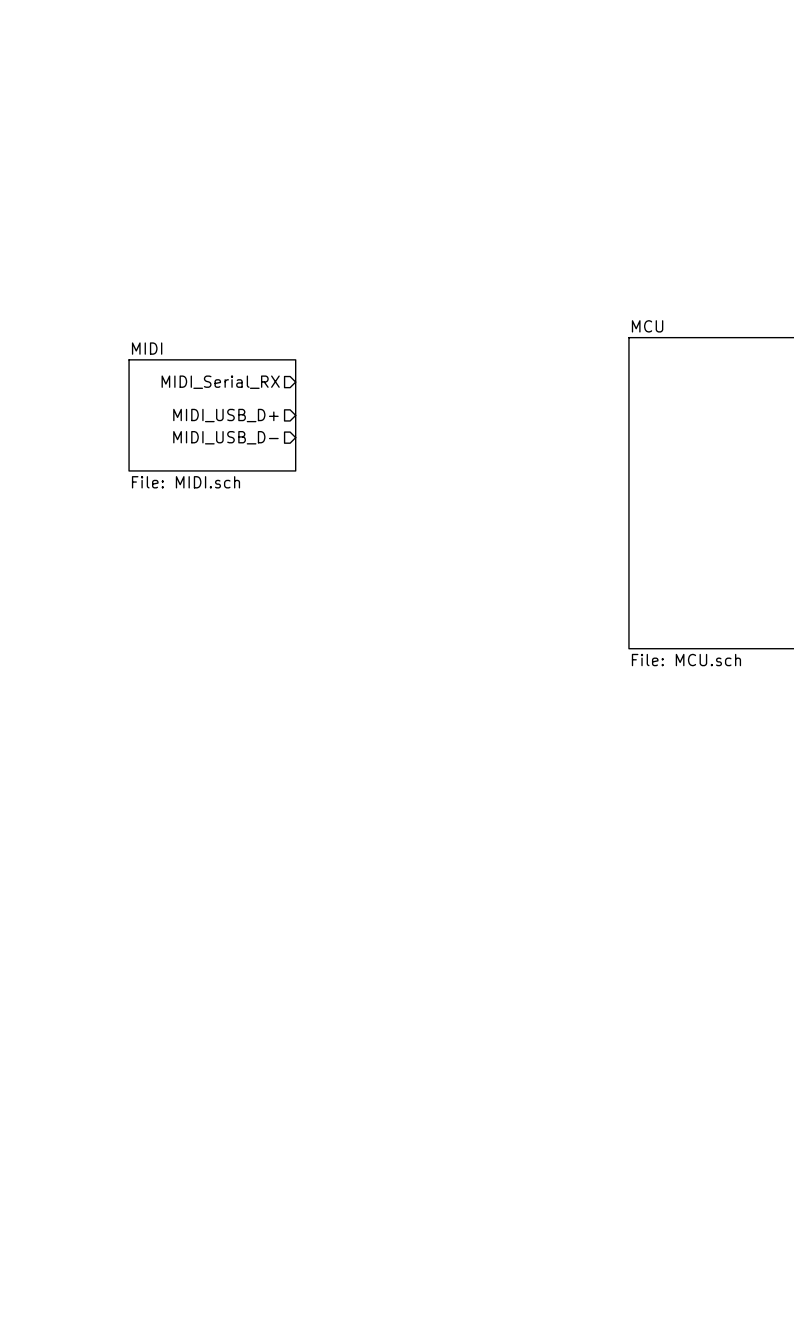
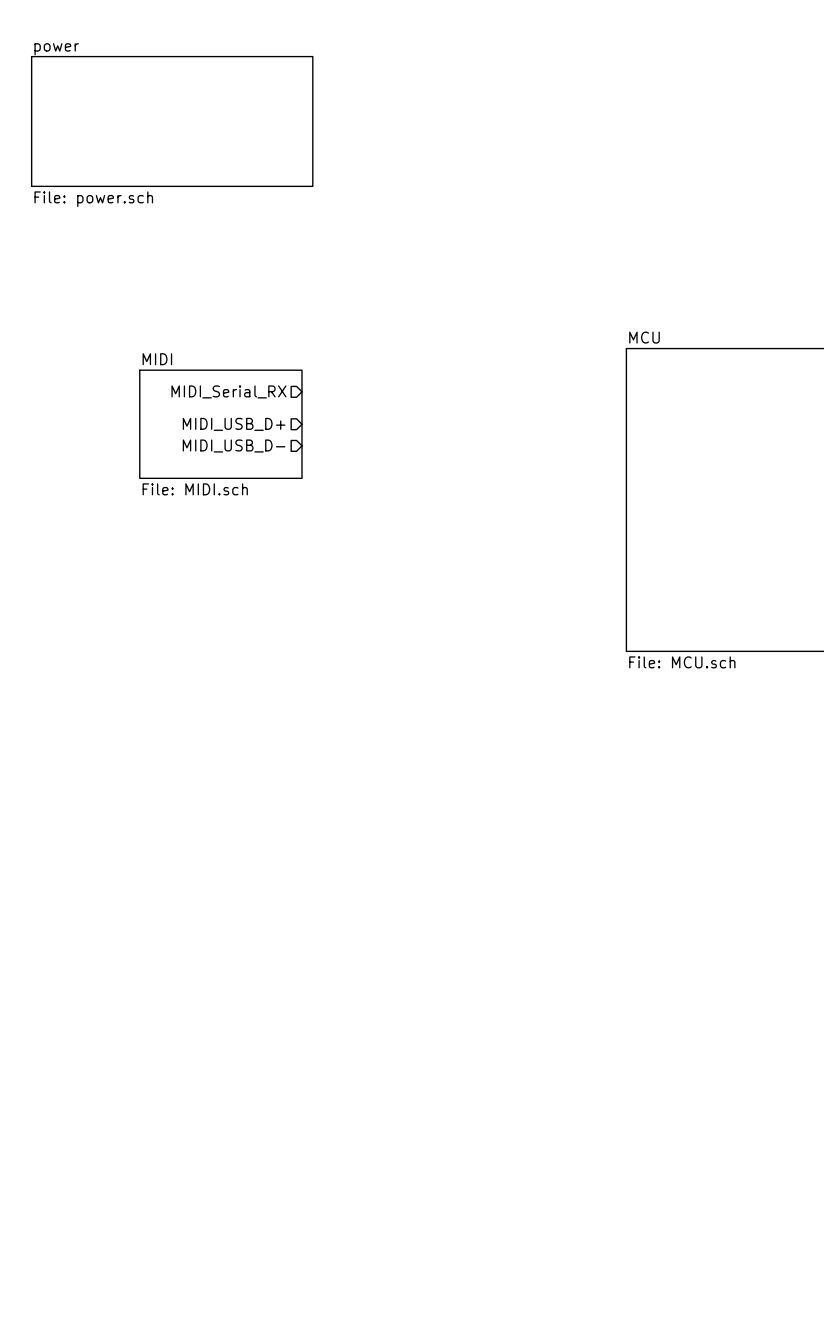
sheet power: none -> File: power.sch (172, 121)

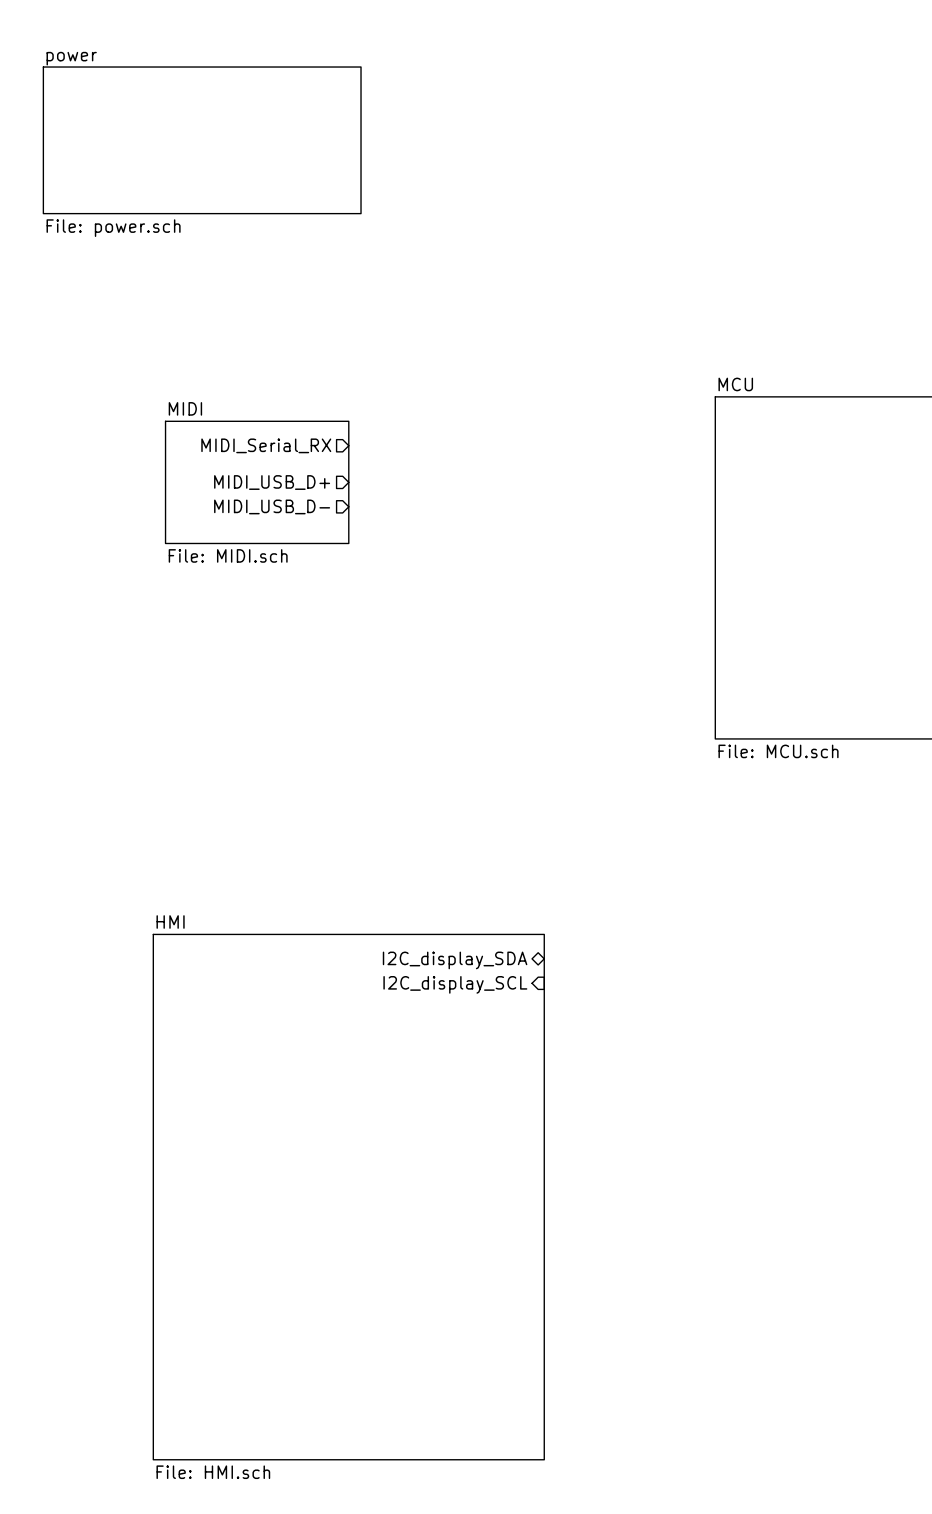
sheet pin: none -> I2C_display_SDA (455, 960)
sheet pin: none -> I2C_display_SCL (455, 984)
sheet HMI: none -> File: HMI.sch (348, 1197)

